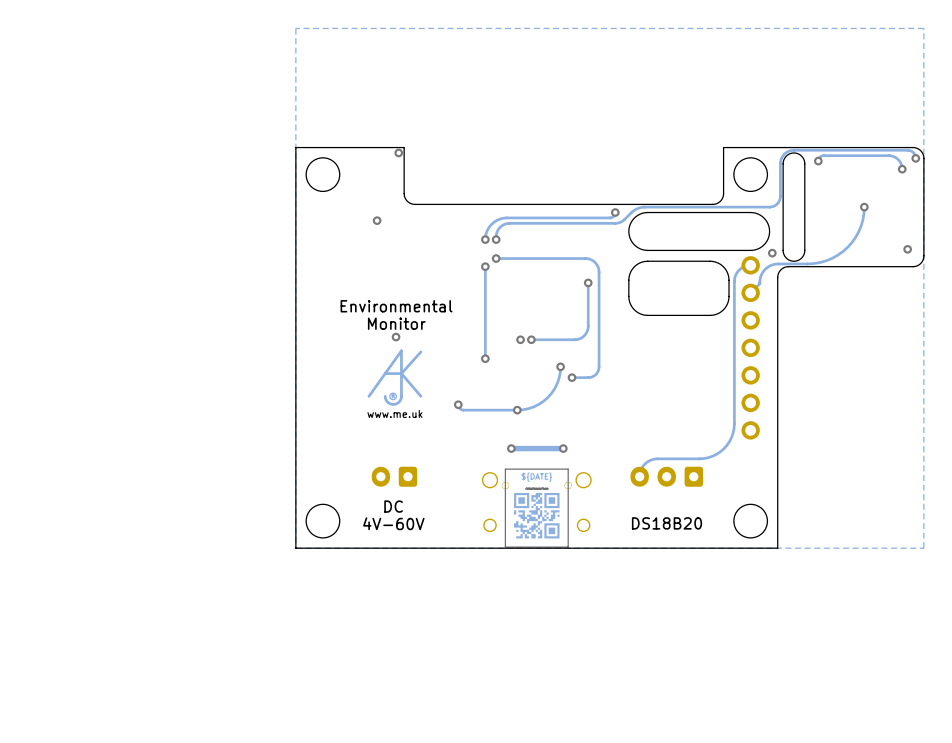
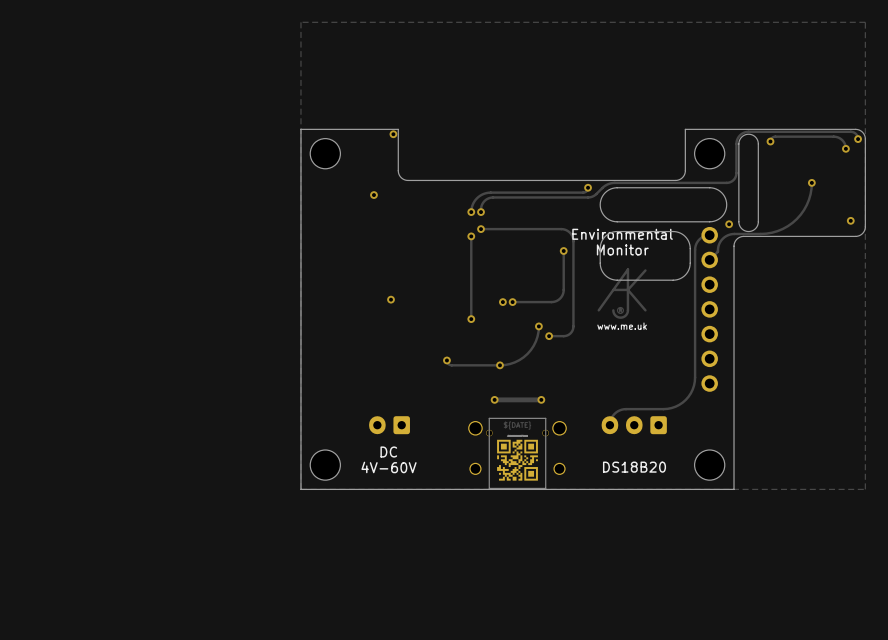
text position: Environmental (396, 306) -> Environmental (622, 234)
text position: Monitor (396, 323) -> Monitor (622, 249)
drawing position: (394, 377) -> (622, 293)

